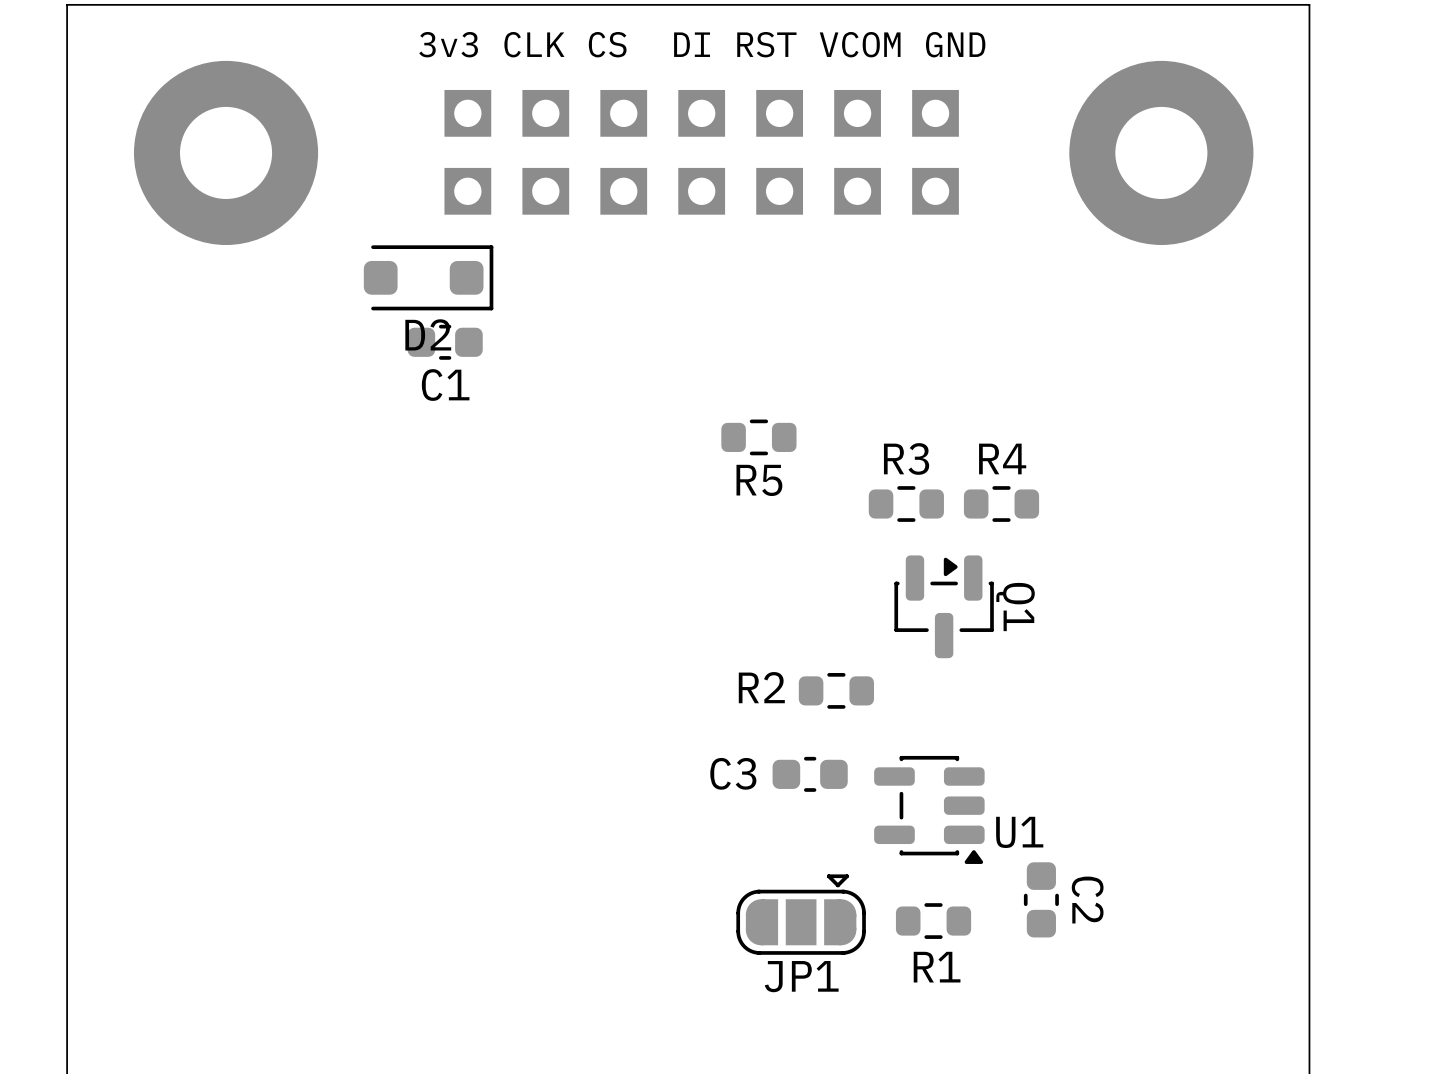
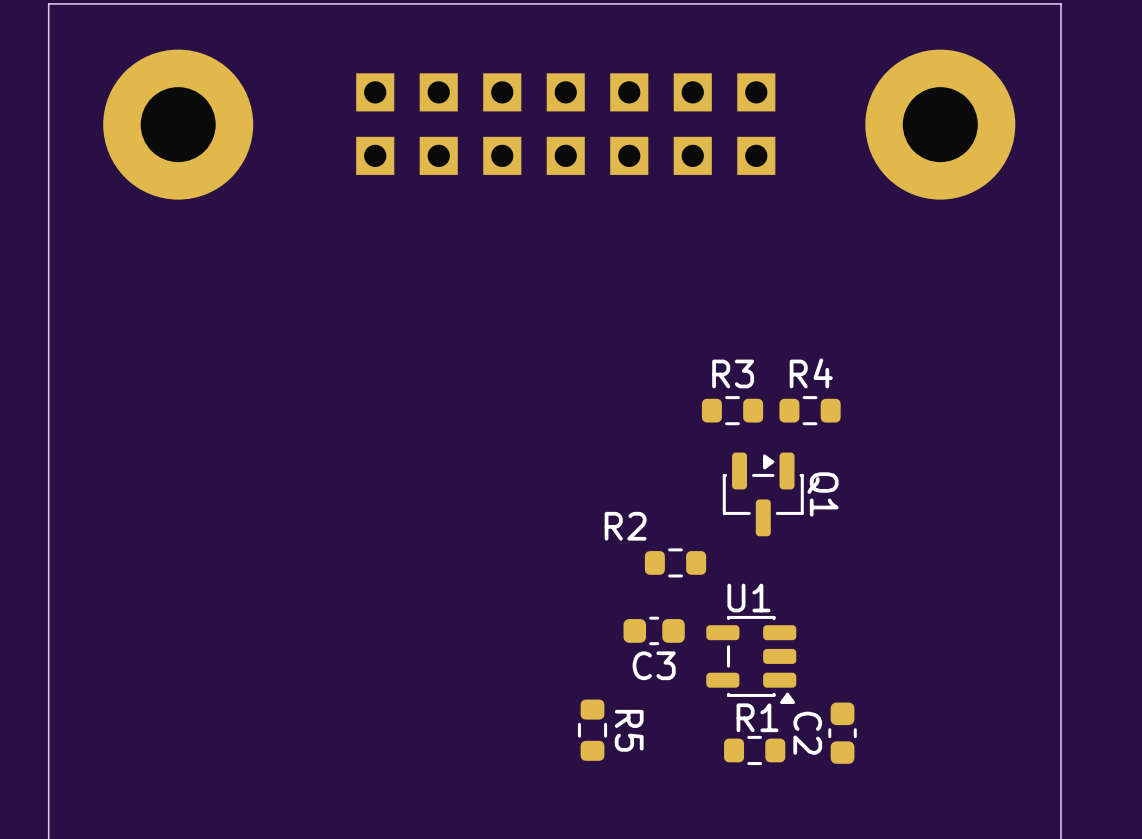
text: 3v3 CLK CS DI RST VCOM GND (702, 44) -> none
D2: (428, 277) -> none
C1: (445, 342) -> none
R5 rotation: 0° (758, 437) -> 90° clockwise (592, 730)
R5 position: (758, 437) -> (592, 730)
R5 name position: R5 (759, 480) -> R5 (629, 730)
R2 name position: R2 (761, 687) -> R2 (625, 526)
C3 name position: C3 (733, 773) -> C3 (654, 665)
U1 name position: U1 (1019, 832) -> U1 (748, 598)
C2 name position: C2 (1087, 900) -> C2 (807, 733)
JP1: (801, 914) -> none
R1 name position: R1 (937, 967) -> R1 (757, 717)

